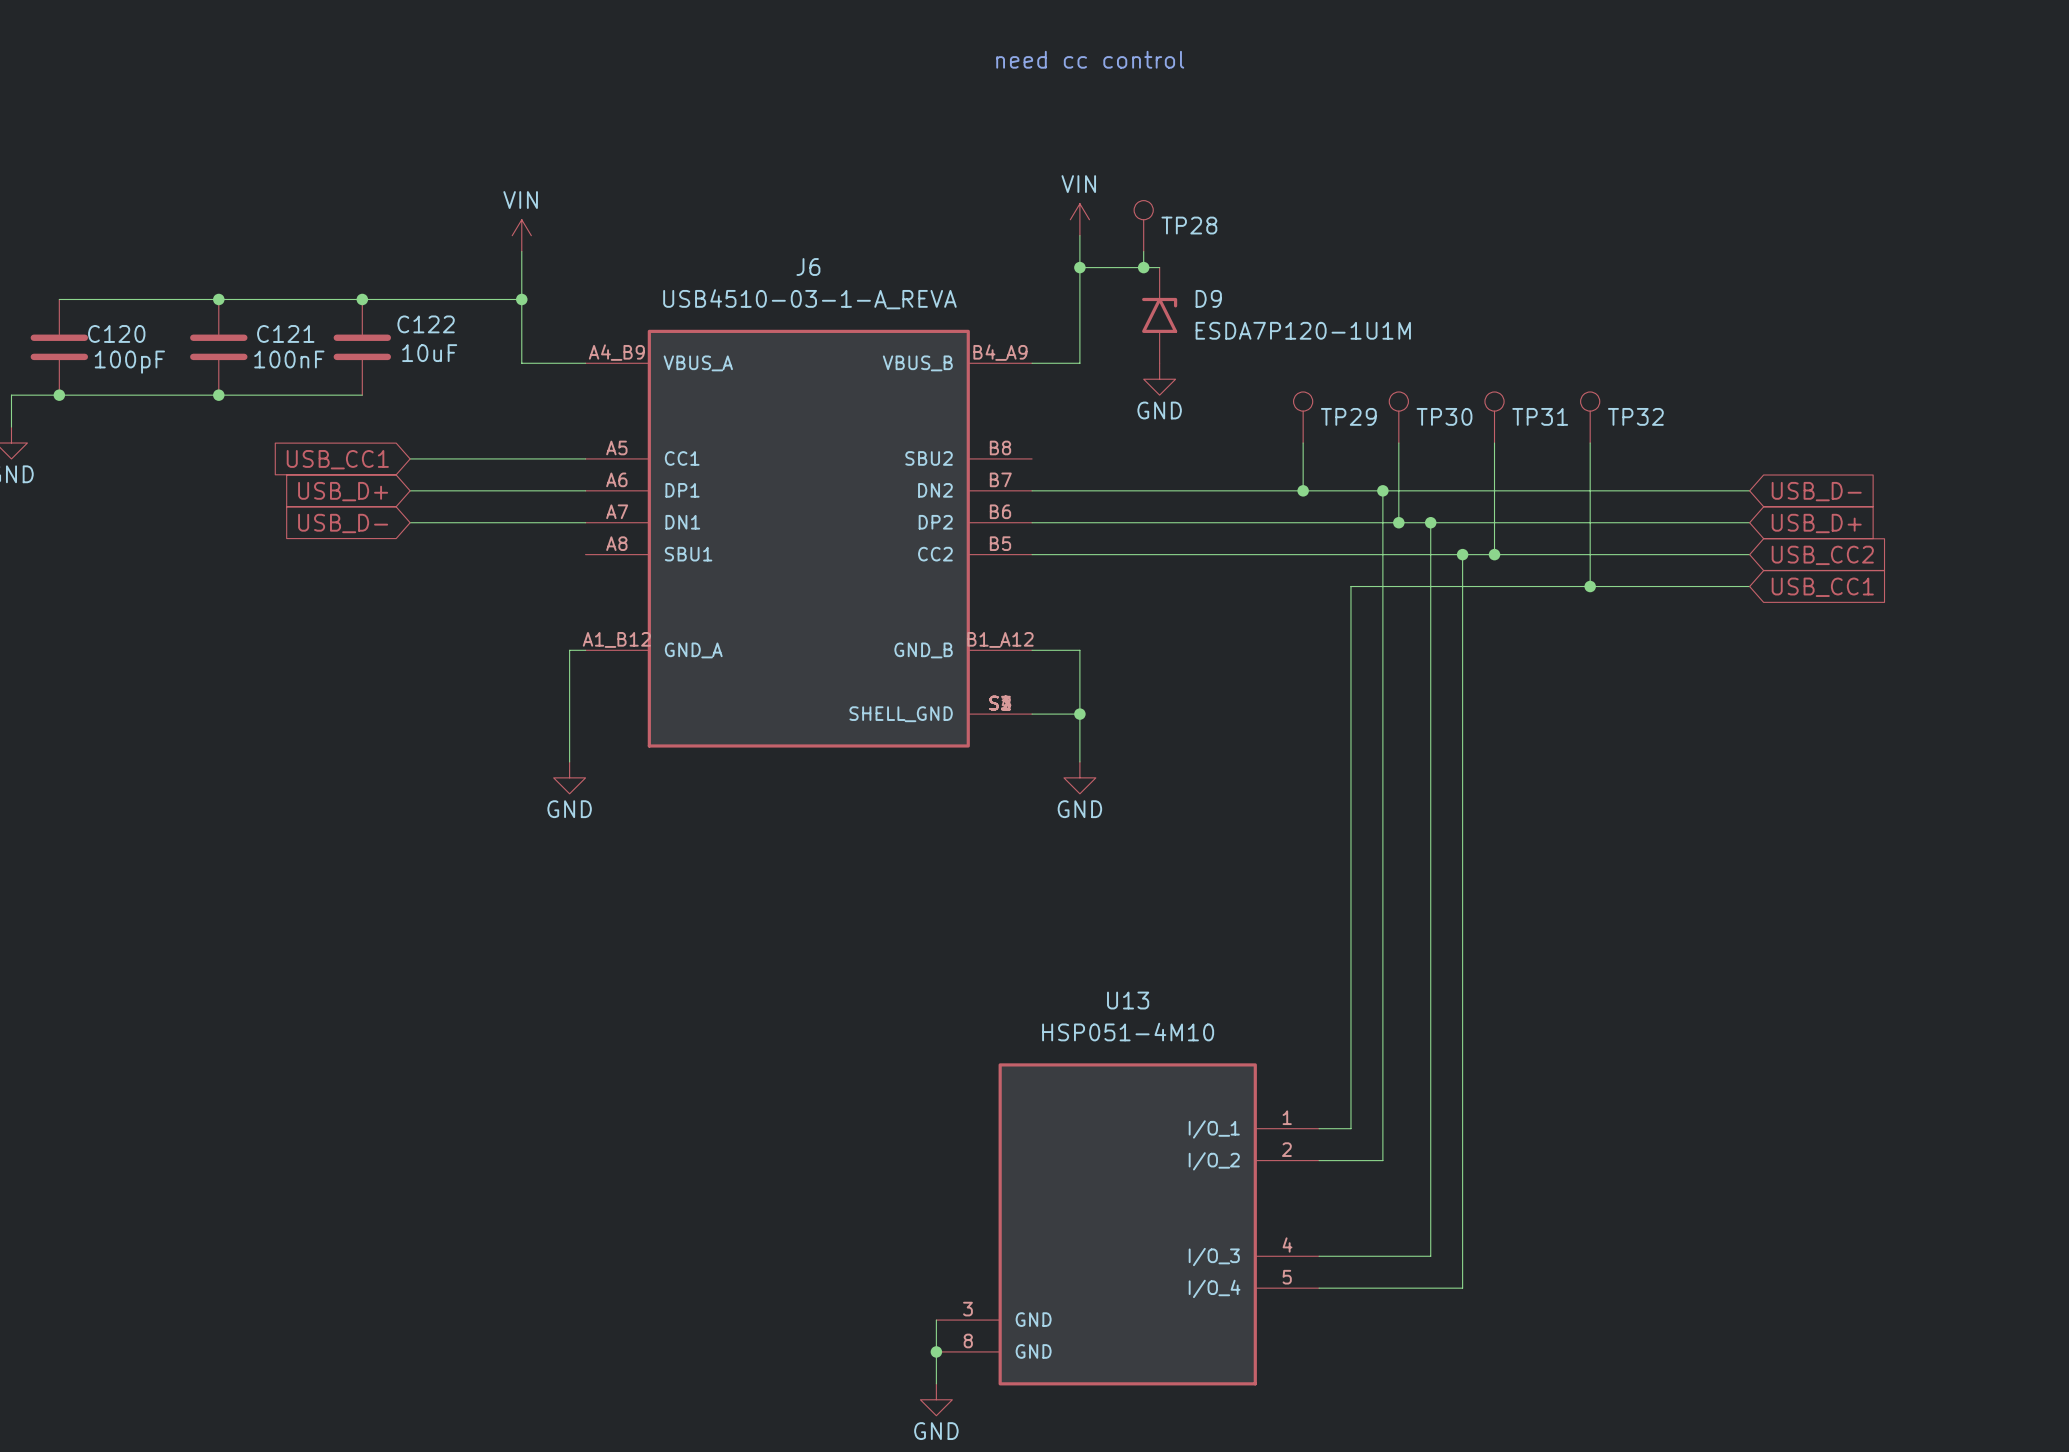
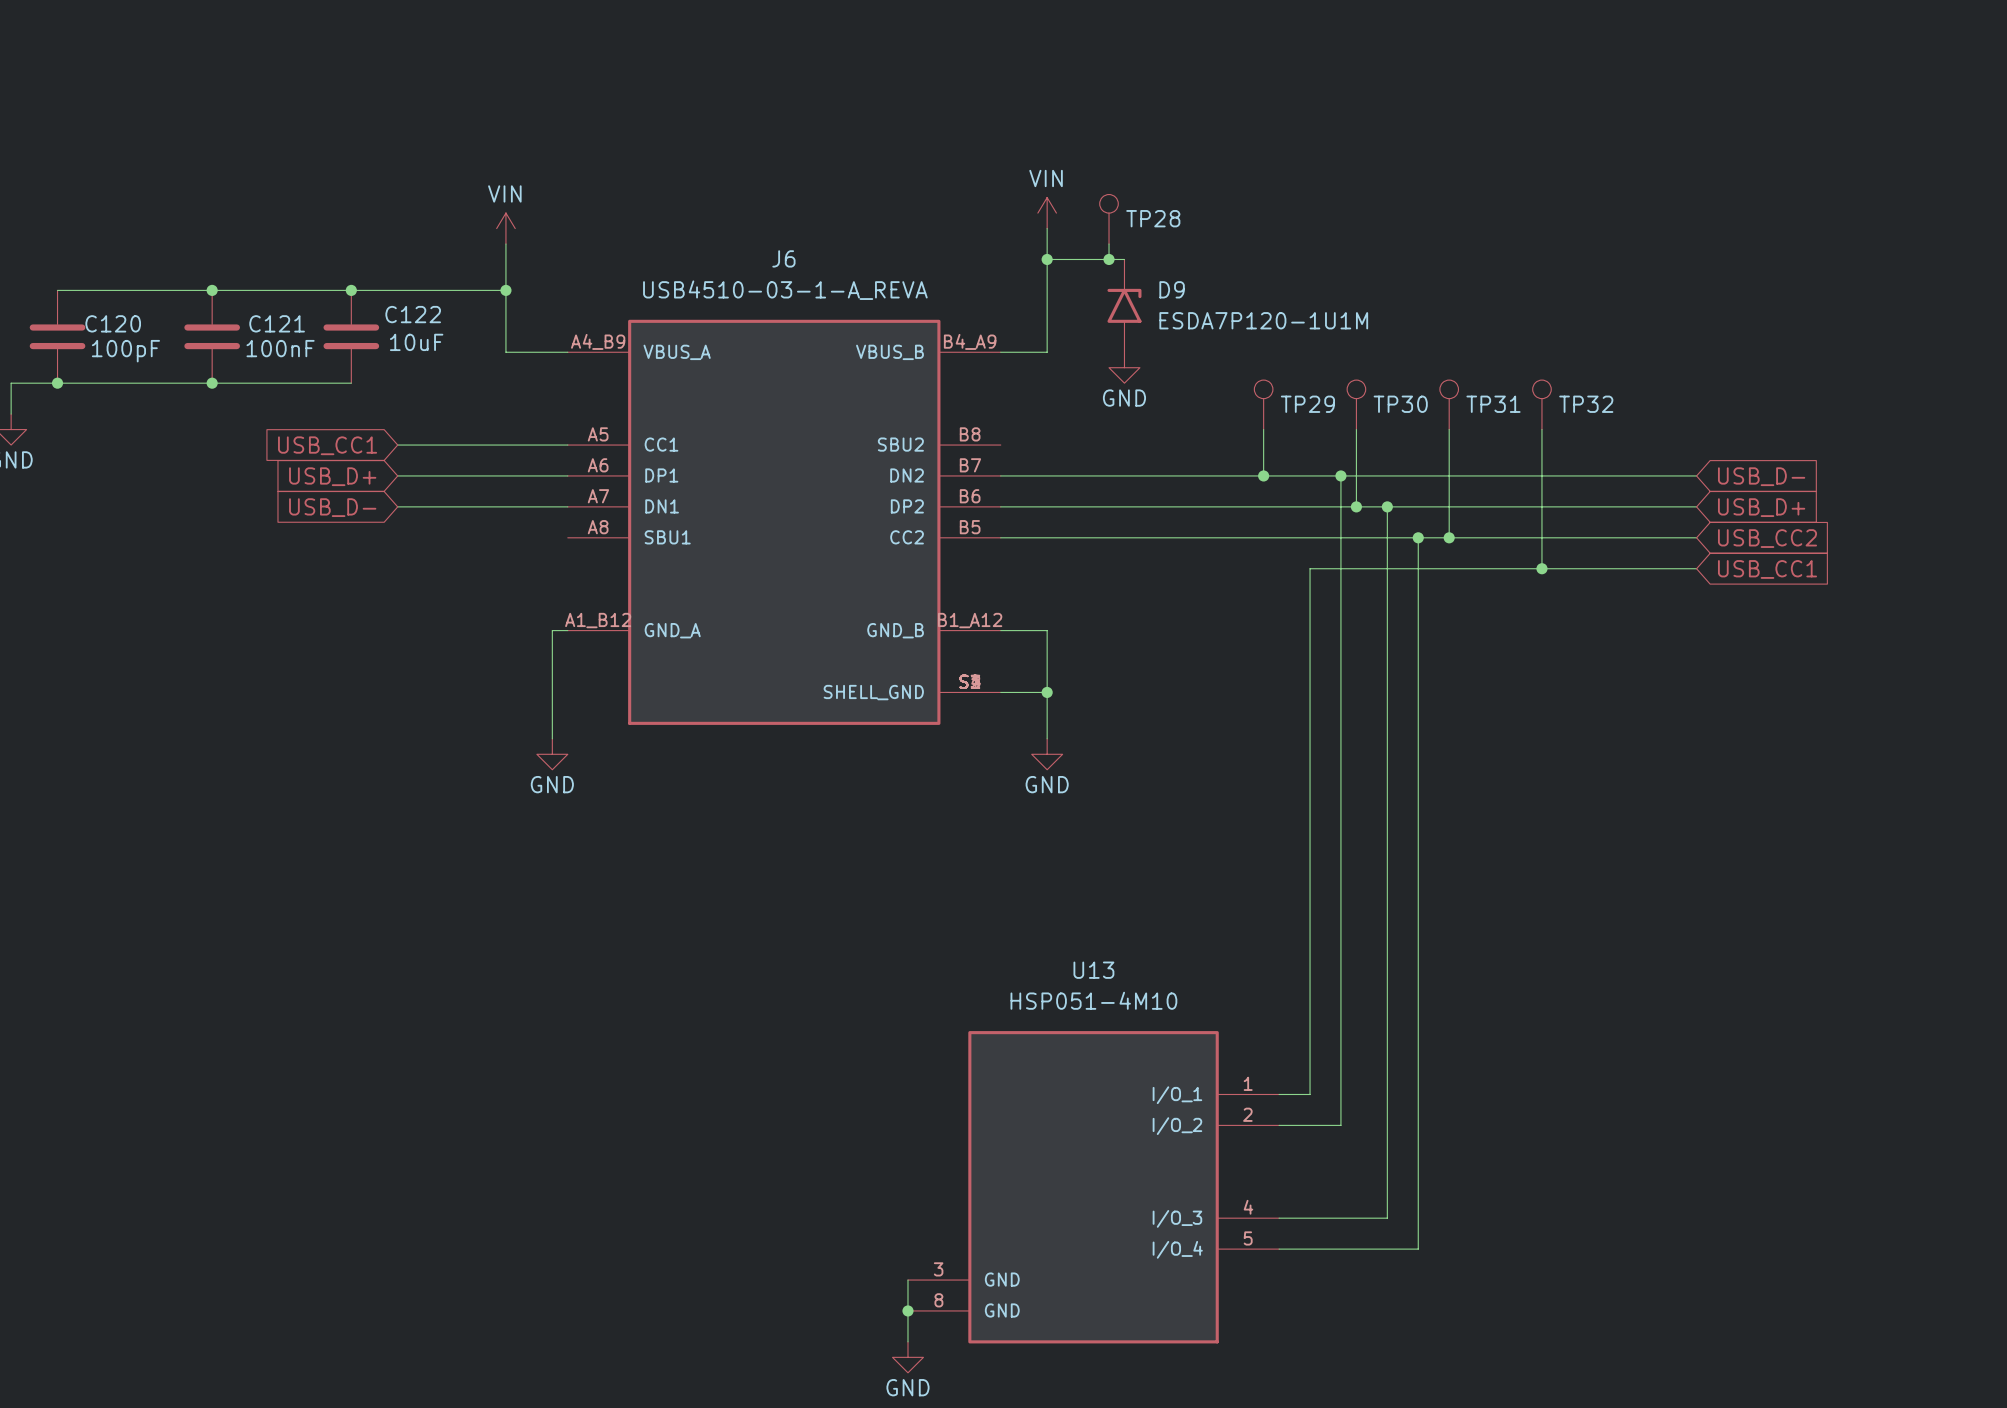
text: need cc control (1090, 59) -> none

